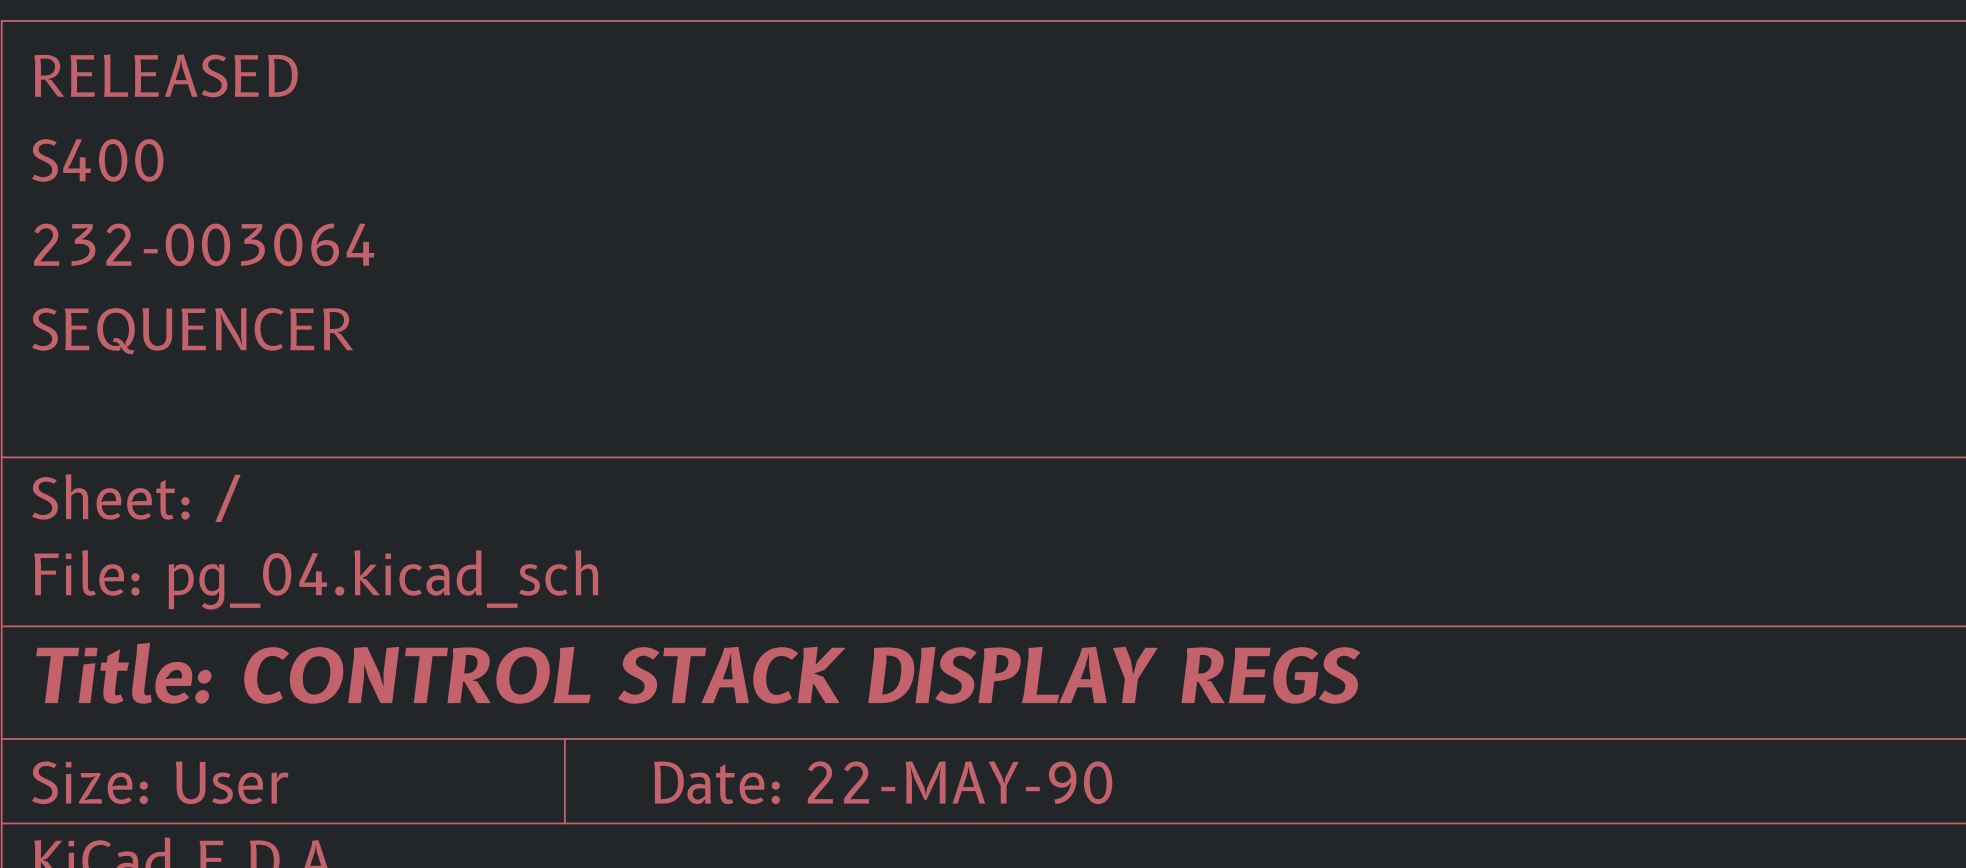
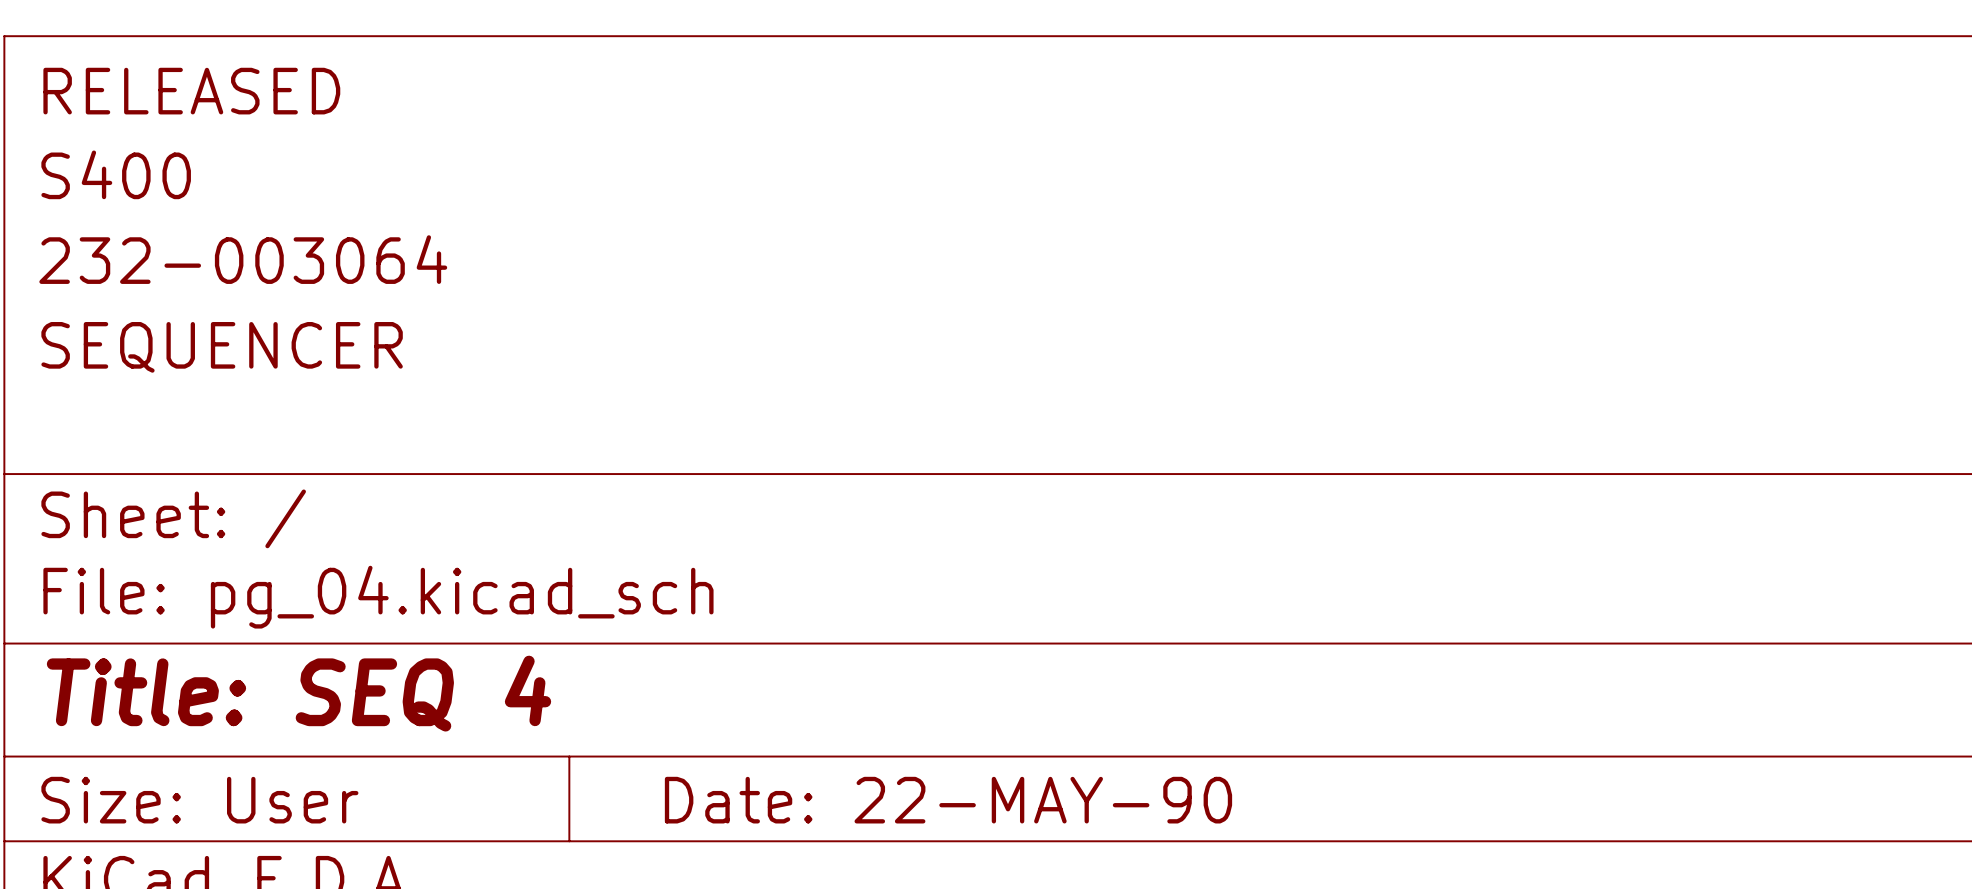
title block: Title: CONTROL STACK DISPLAY REGS (698, 673) -> Title: SEQ 4 (298, 693)

